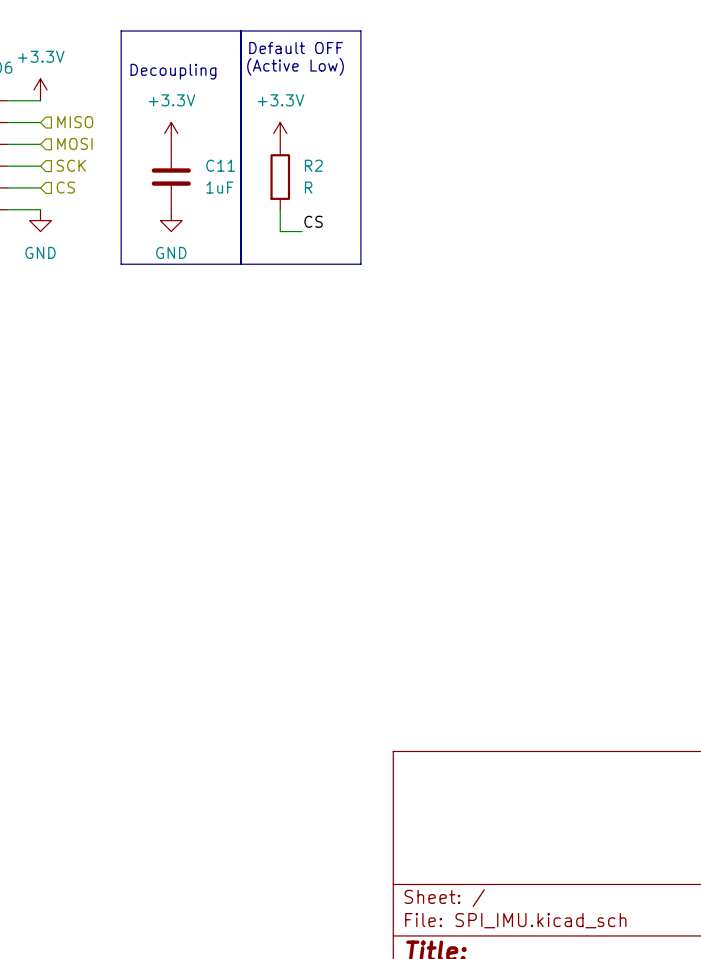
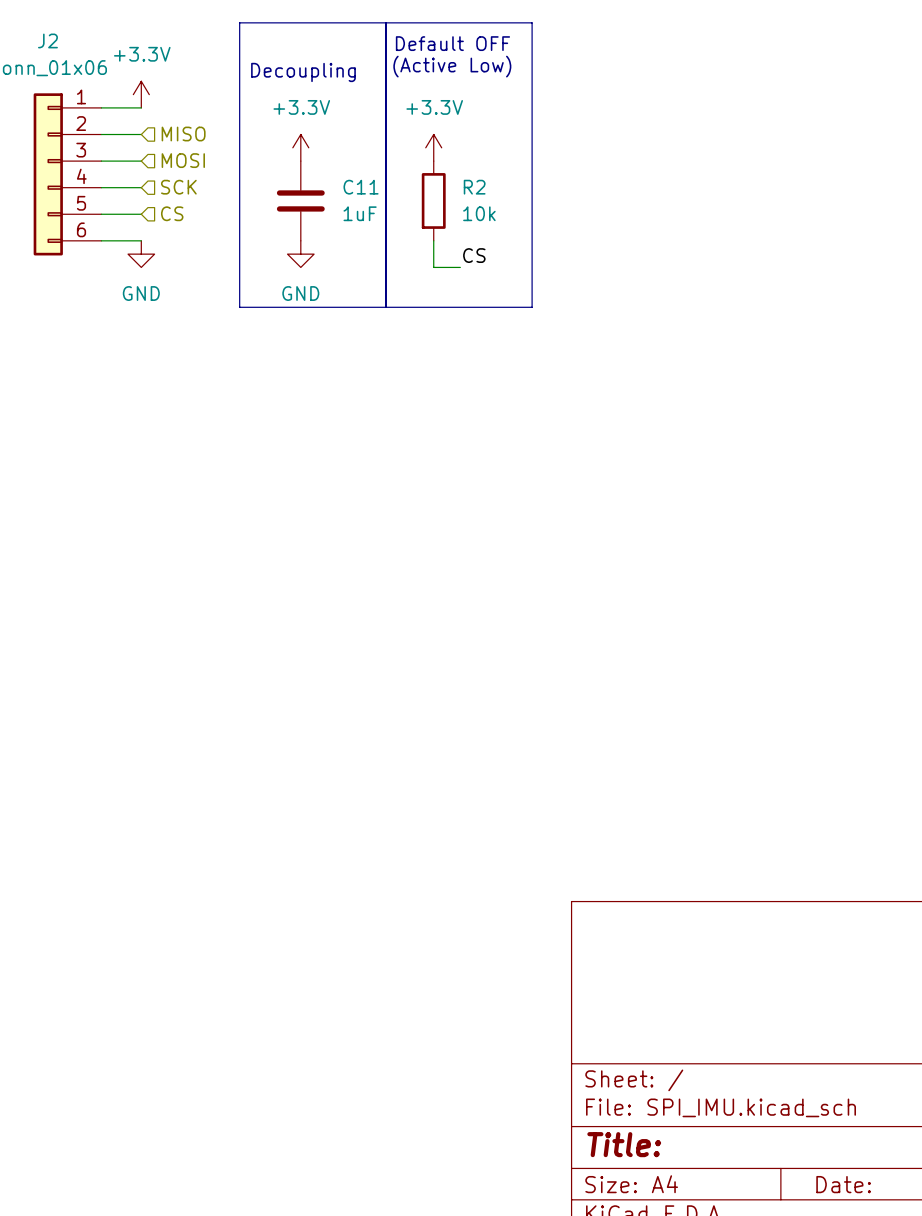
R2 value: R (308, 187) -> 10k (479, 213)

